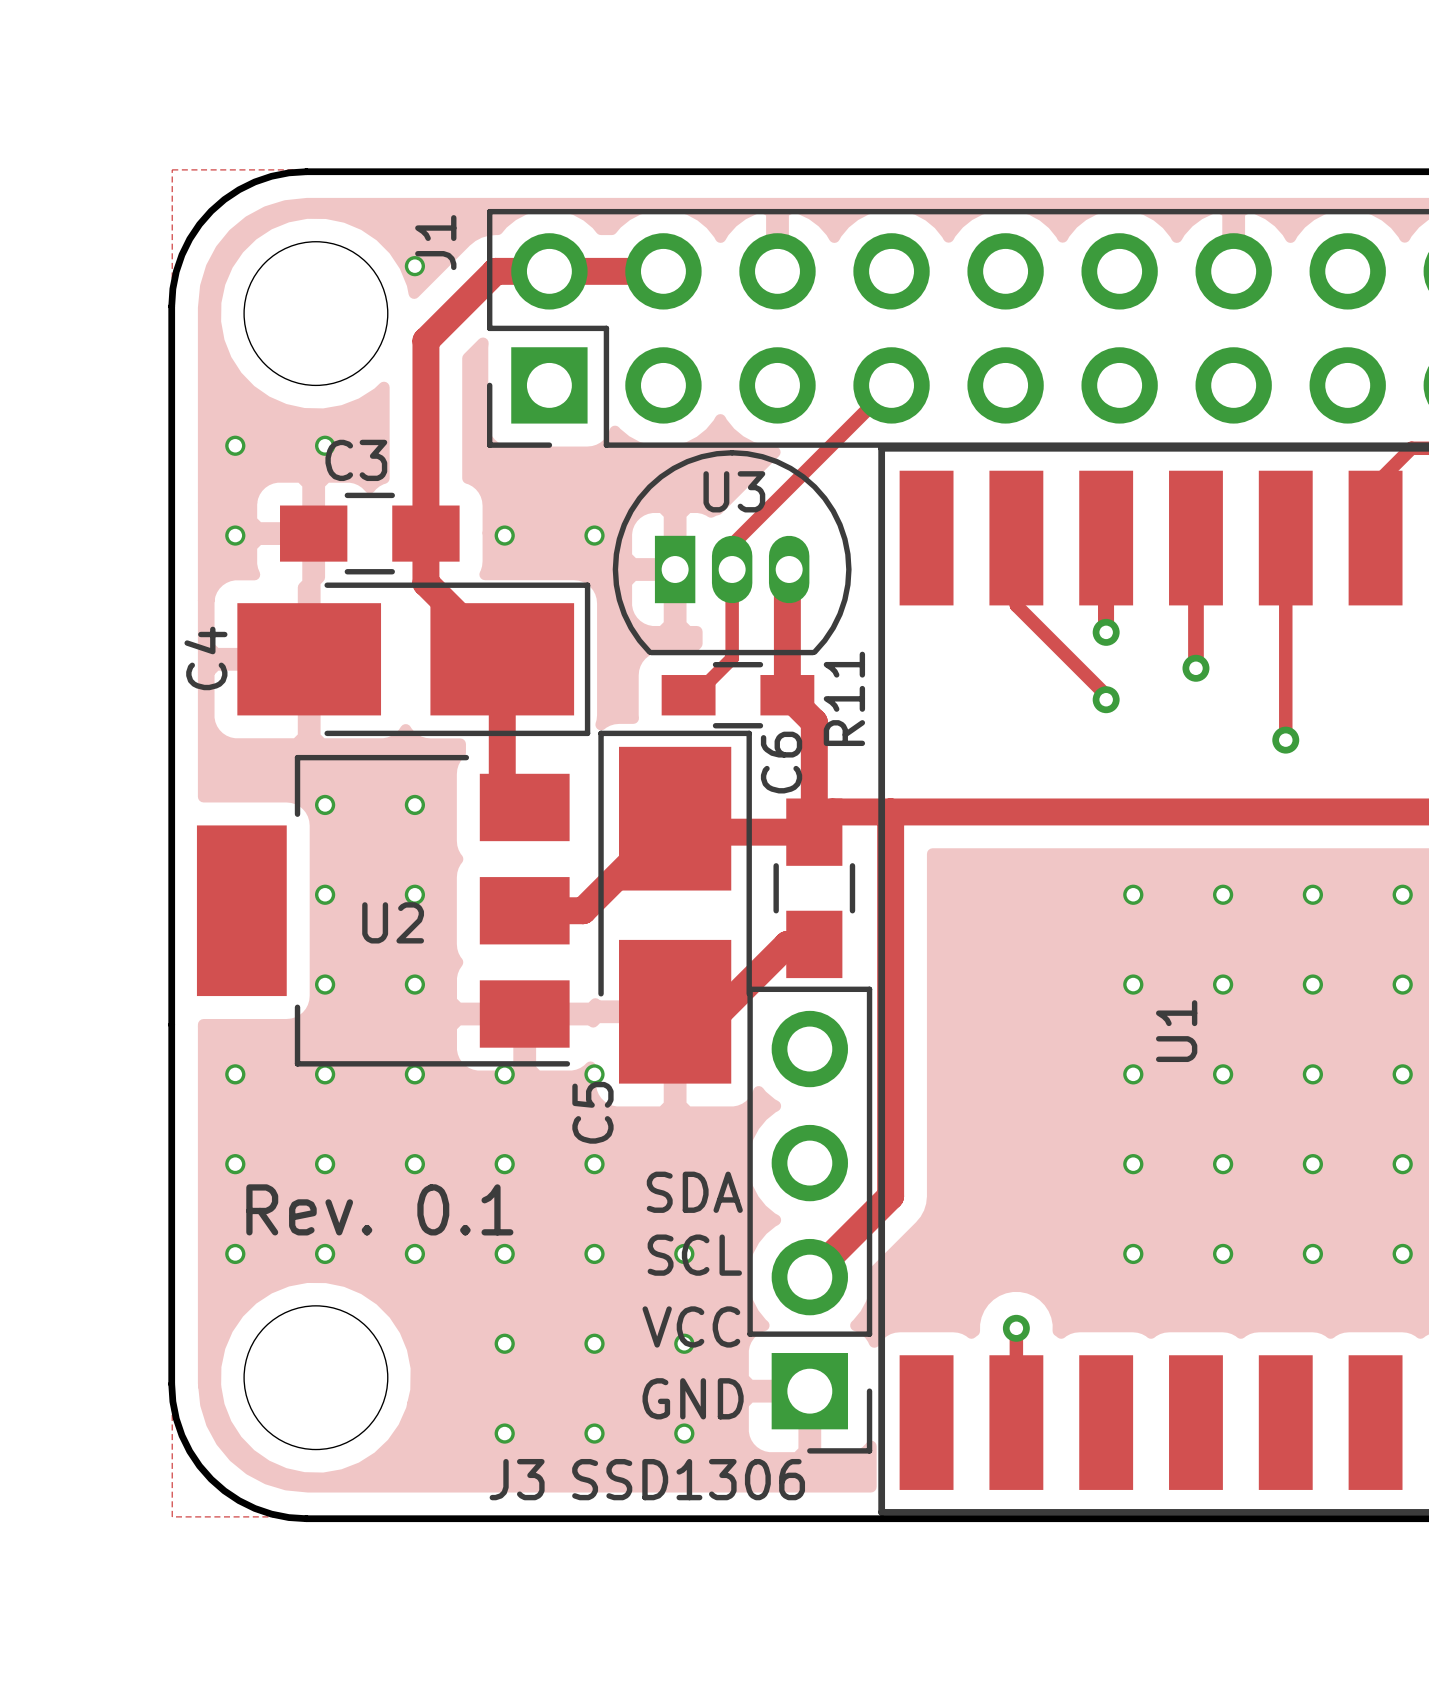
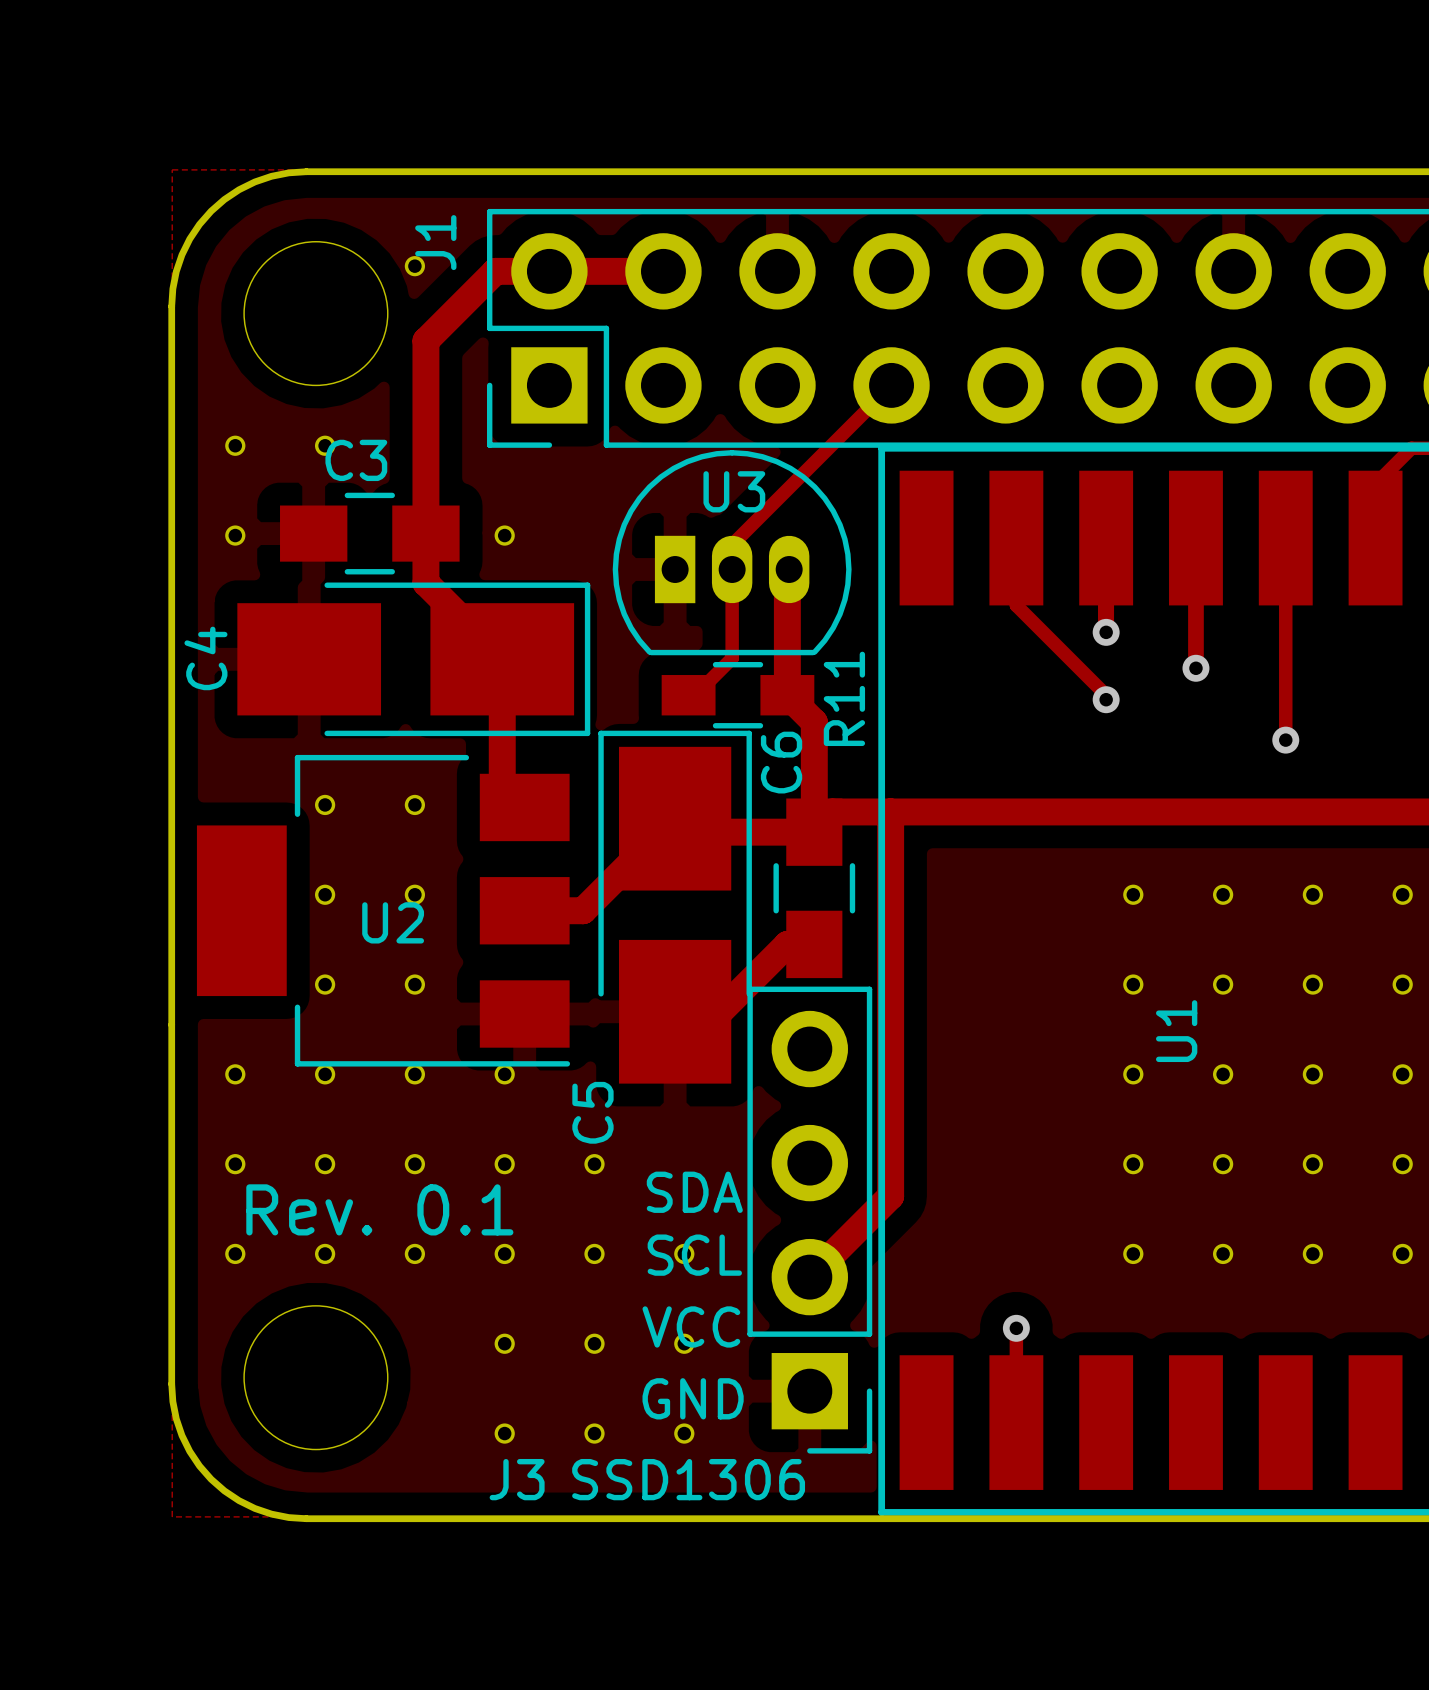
part: (594, 535) -> none
part: (594, 1074) -> none

